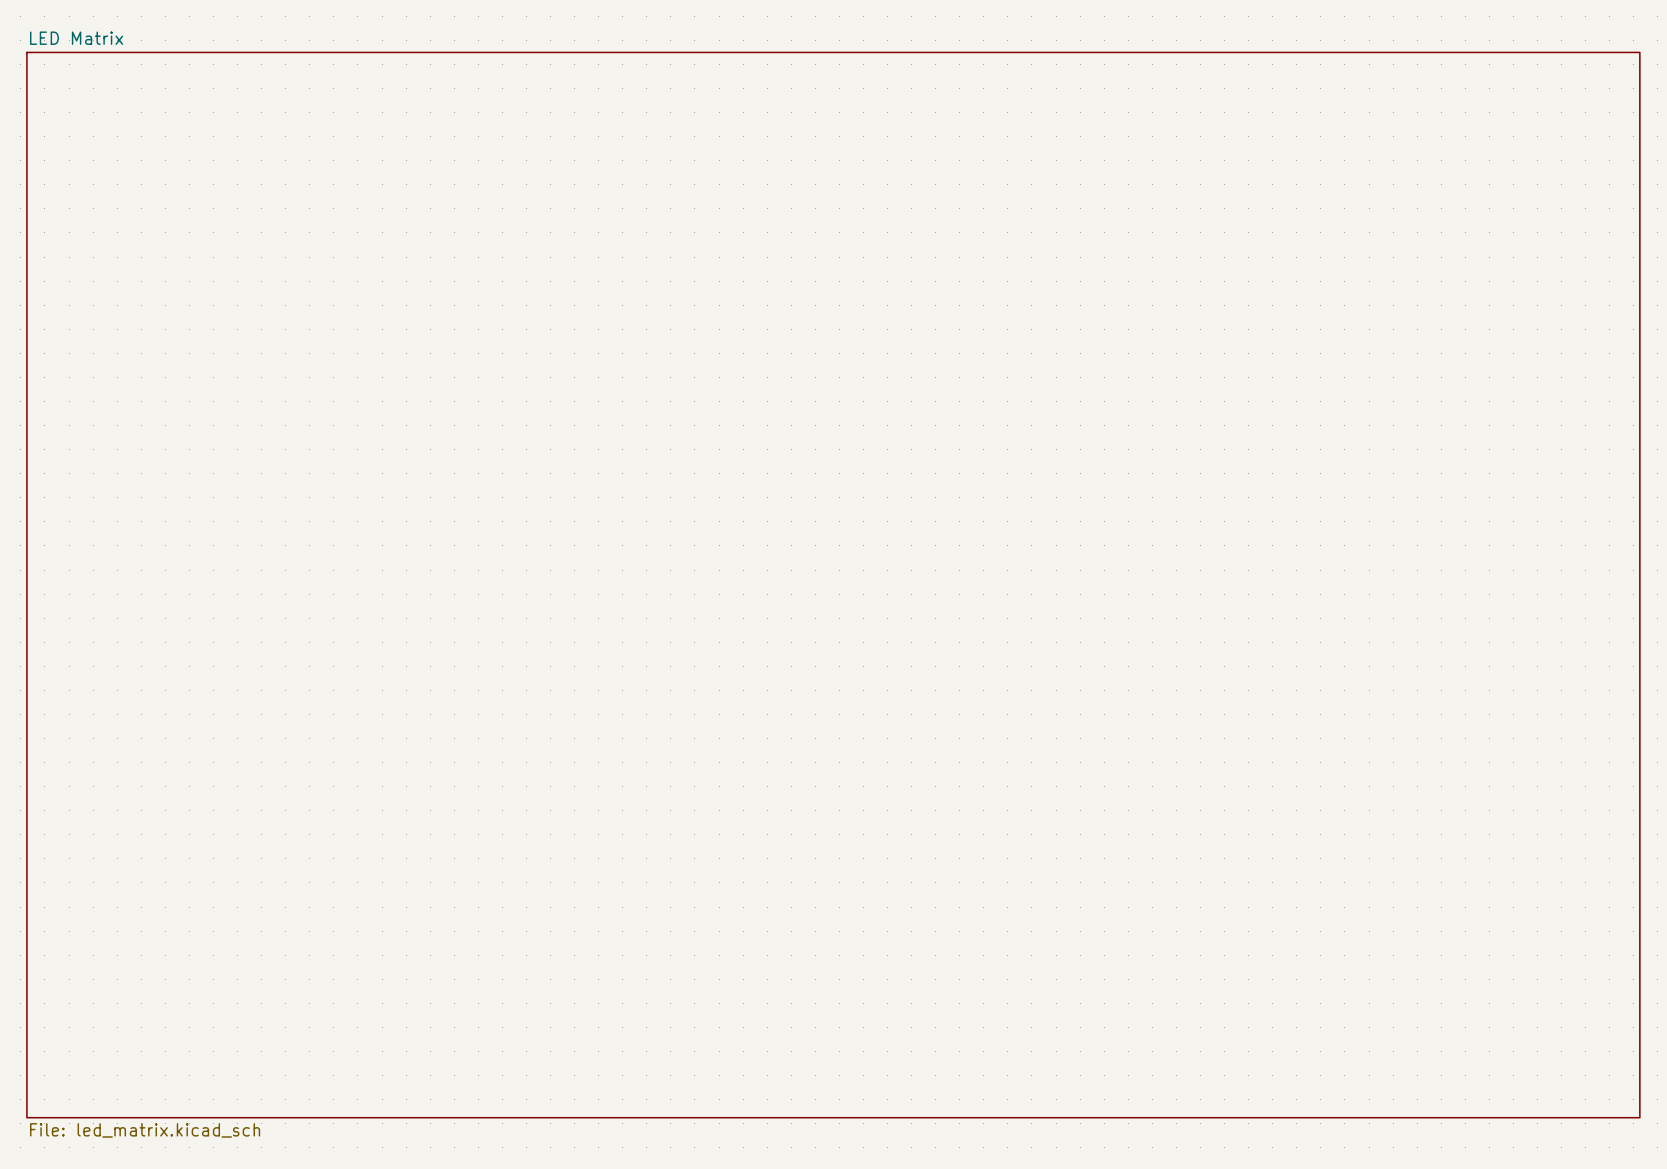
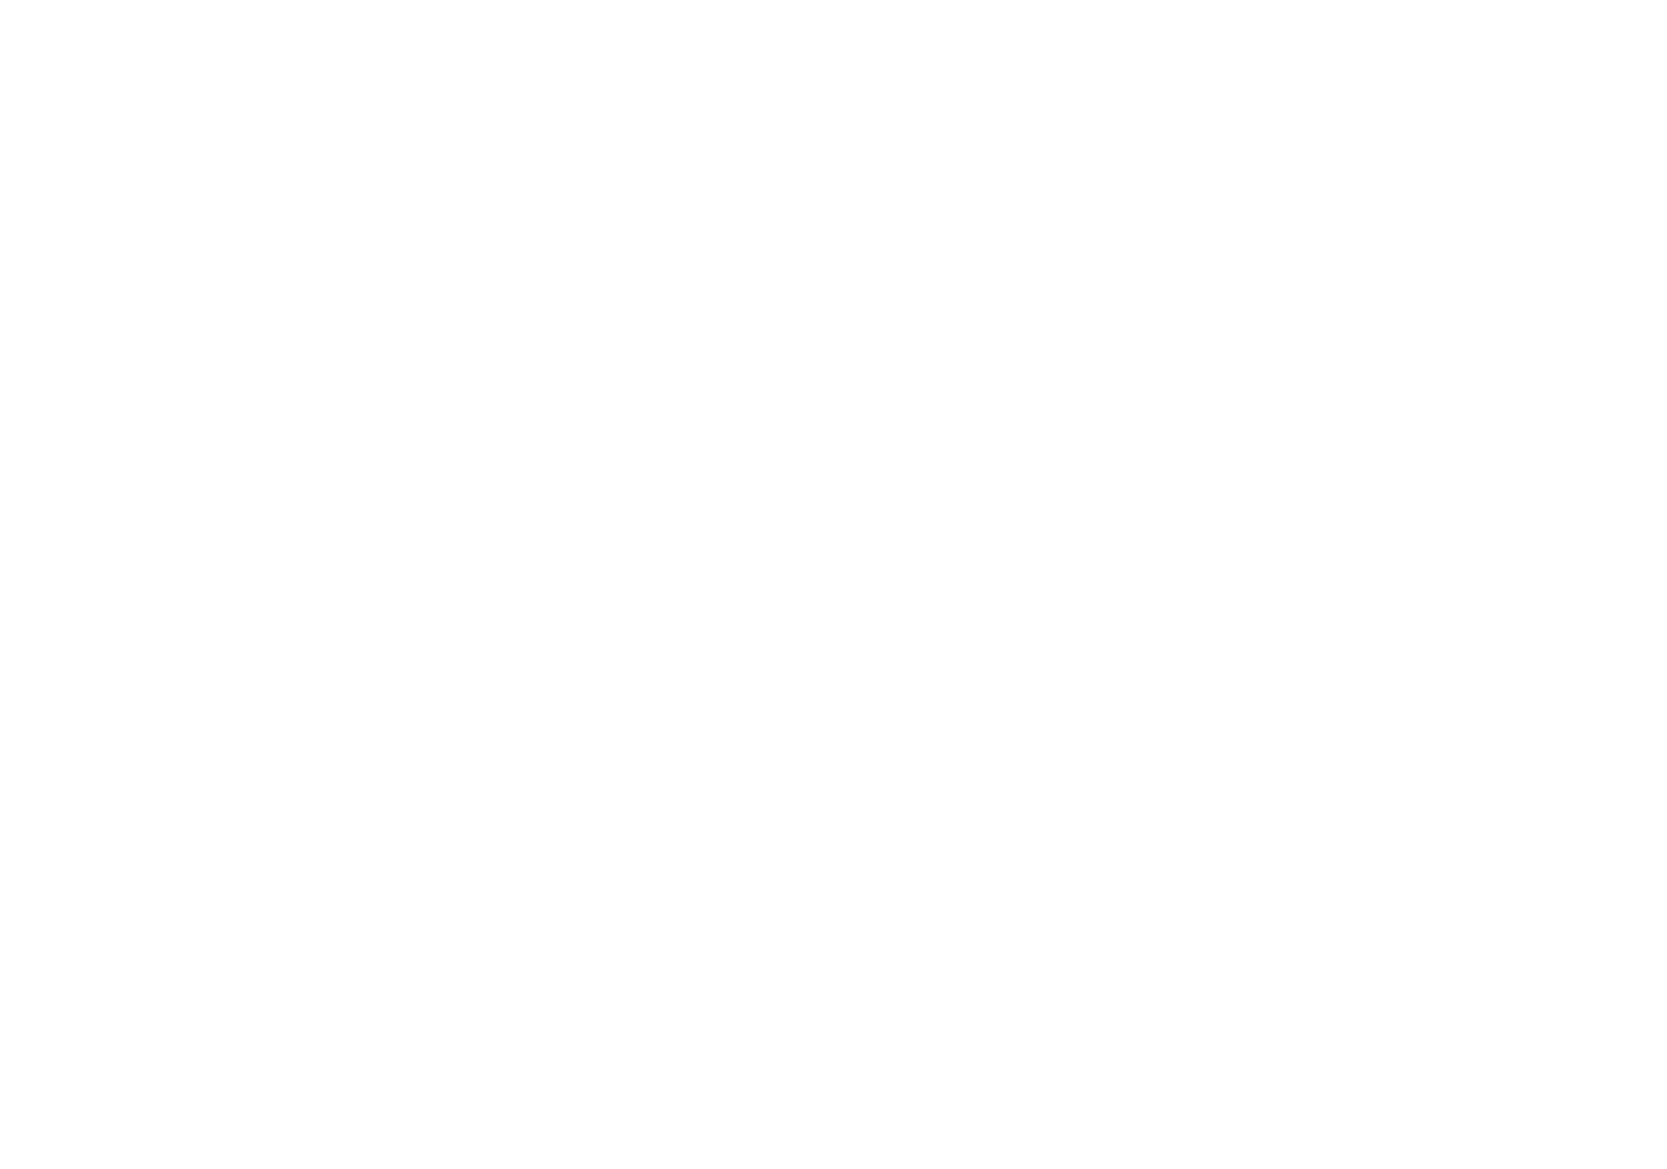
sheet LED Matrix: File: led_matrix.kicad_sch (833, 585) -> none

